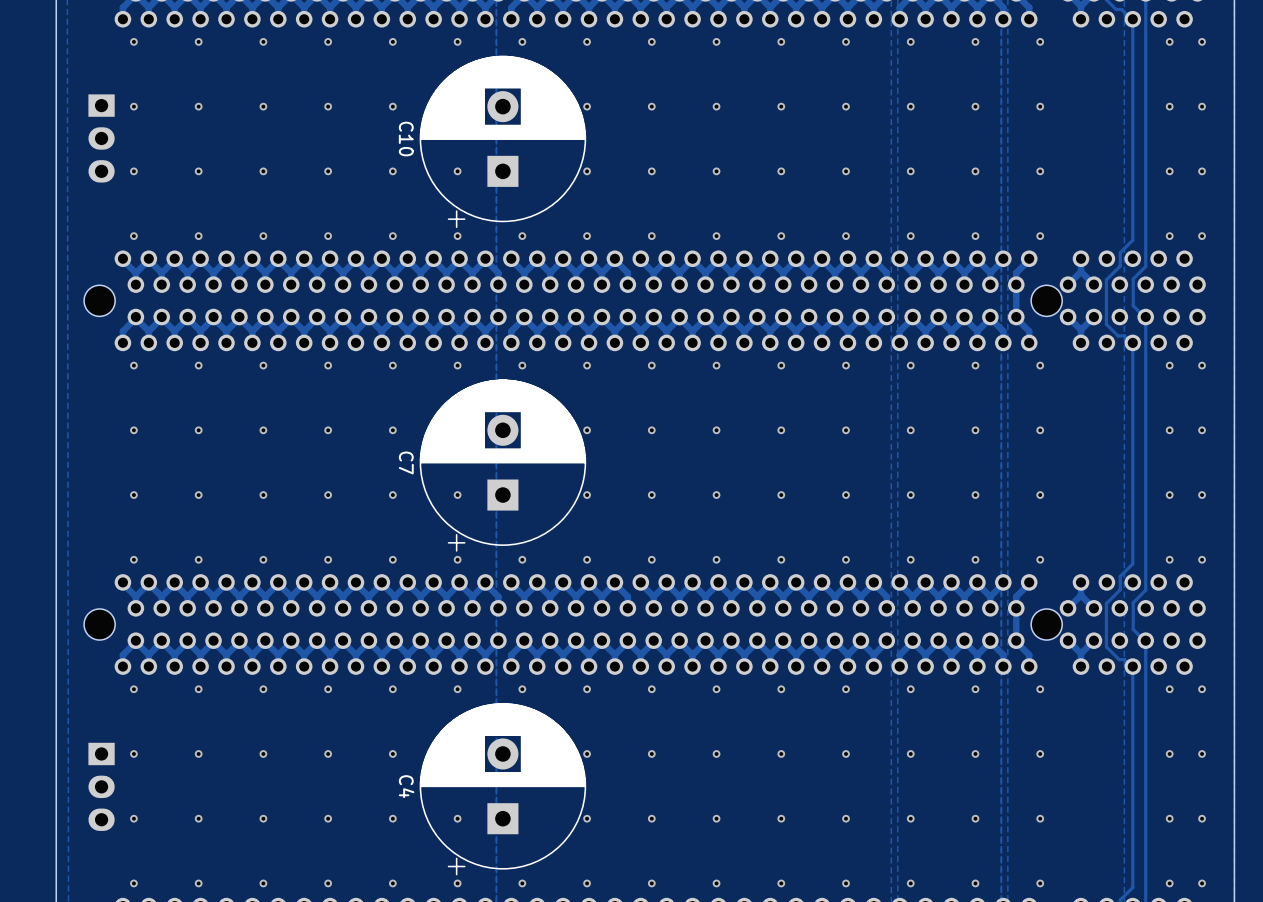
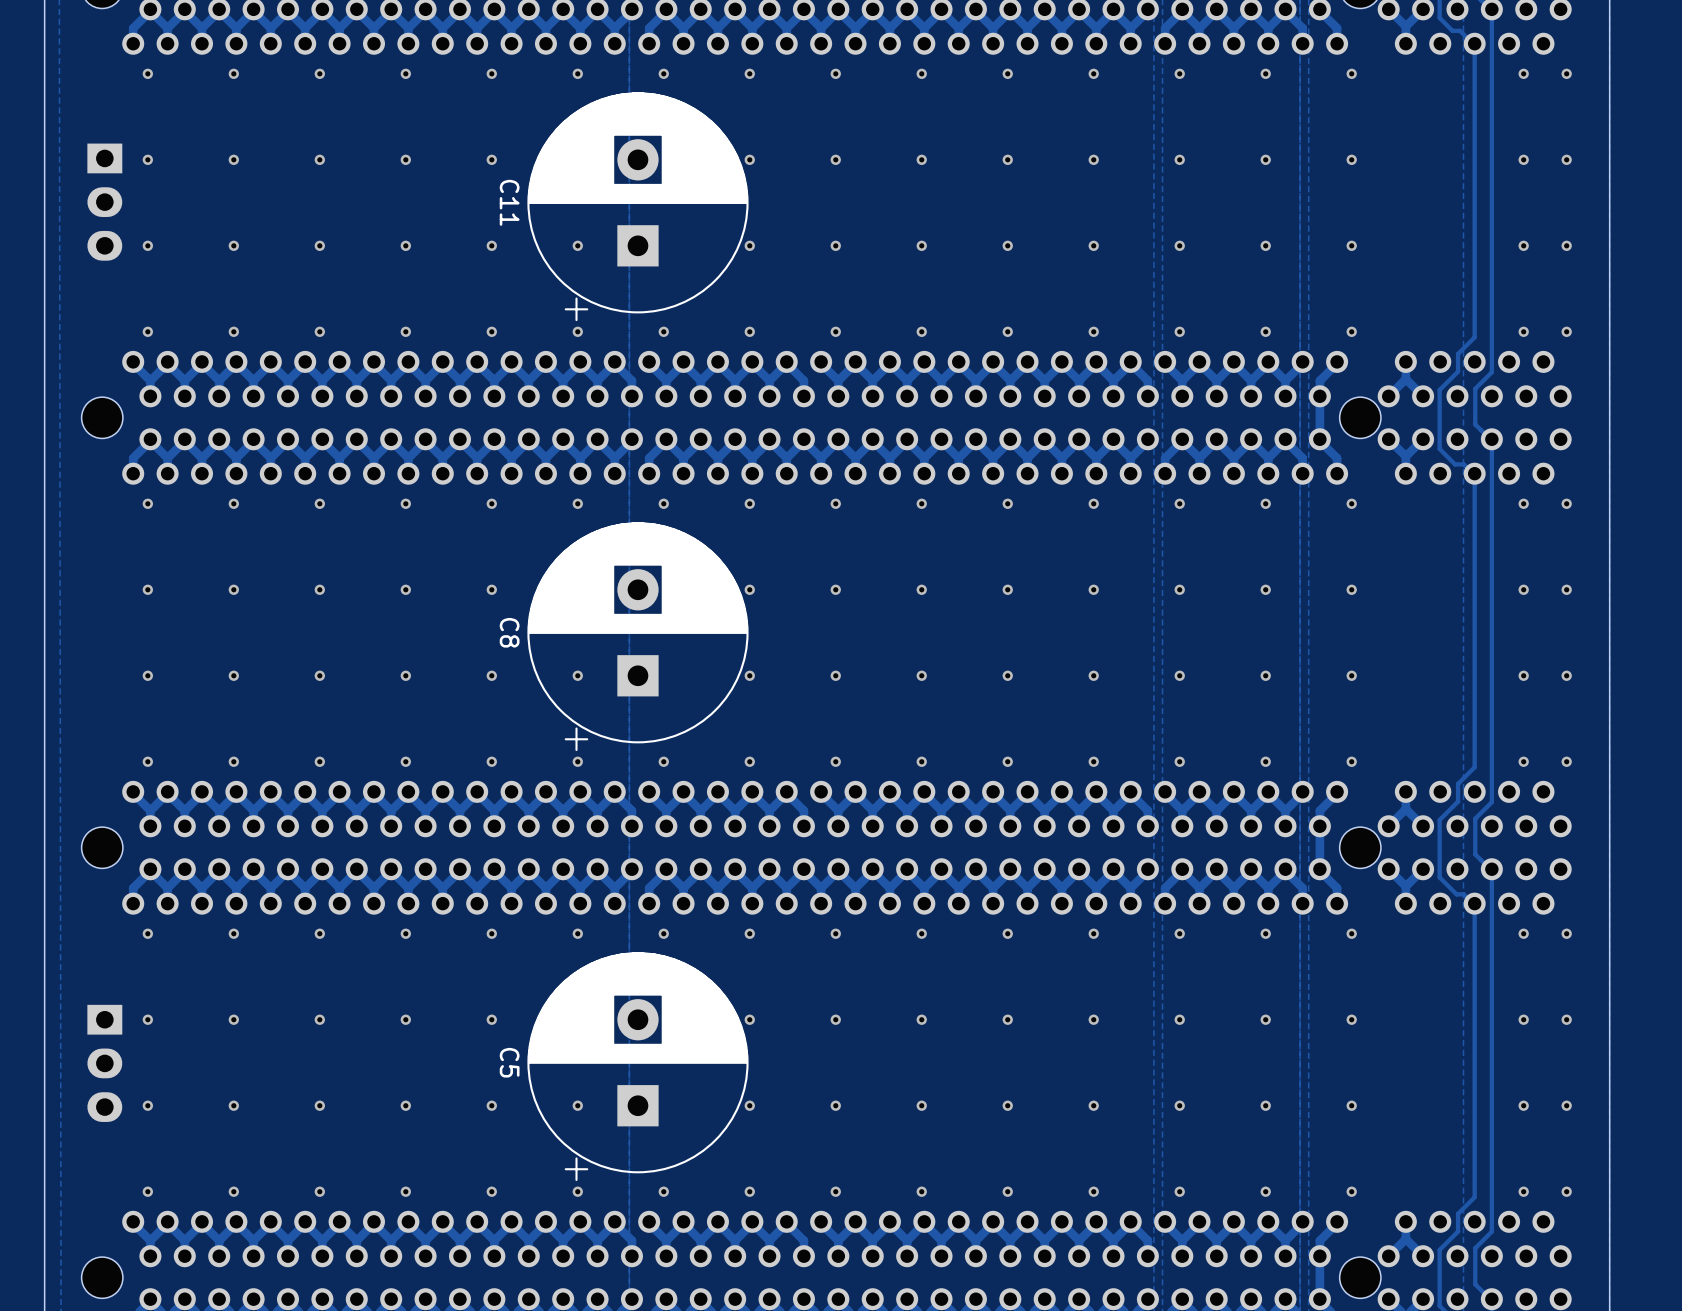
C10 name: C10 (406, 139) -> C11 (509, 202)
C7 name: C7 (406, 462) -> C8 (509, 632)
C4 name: C4 (406, 786) -> C5 (509, 1062)

